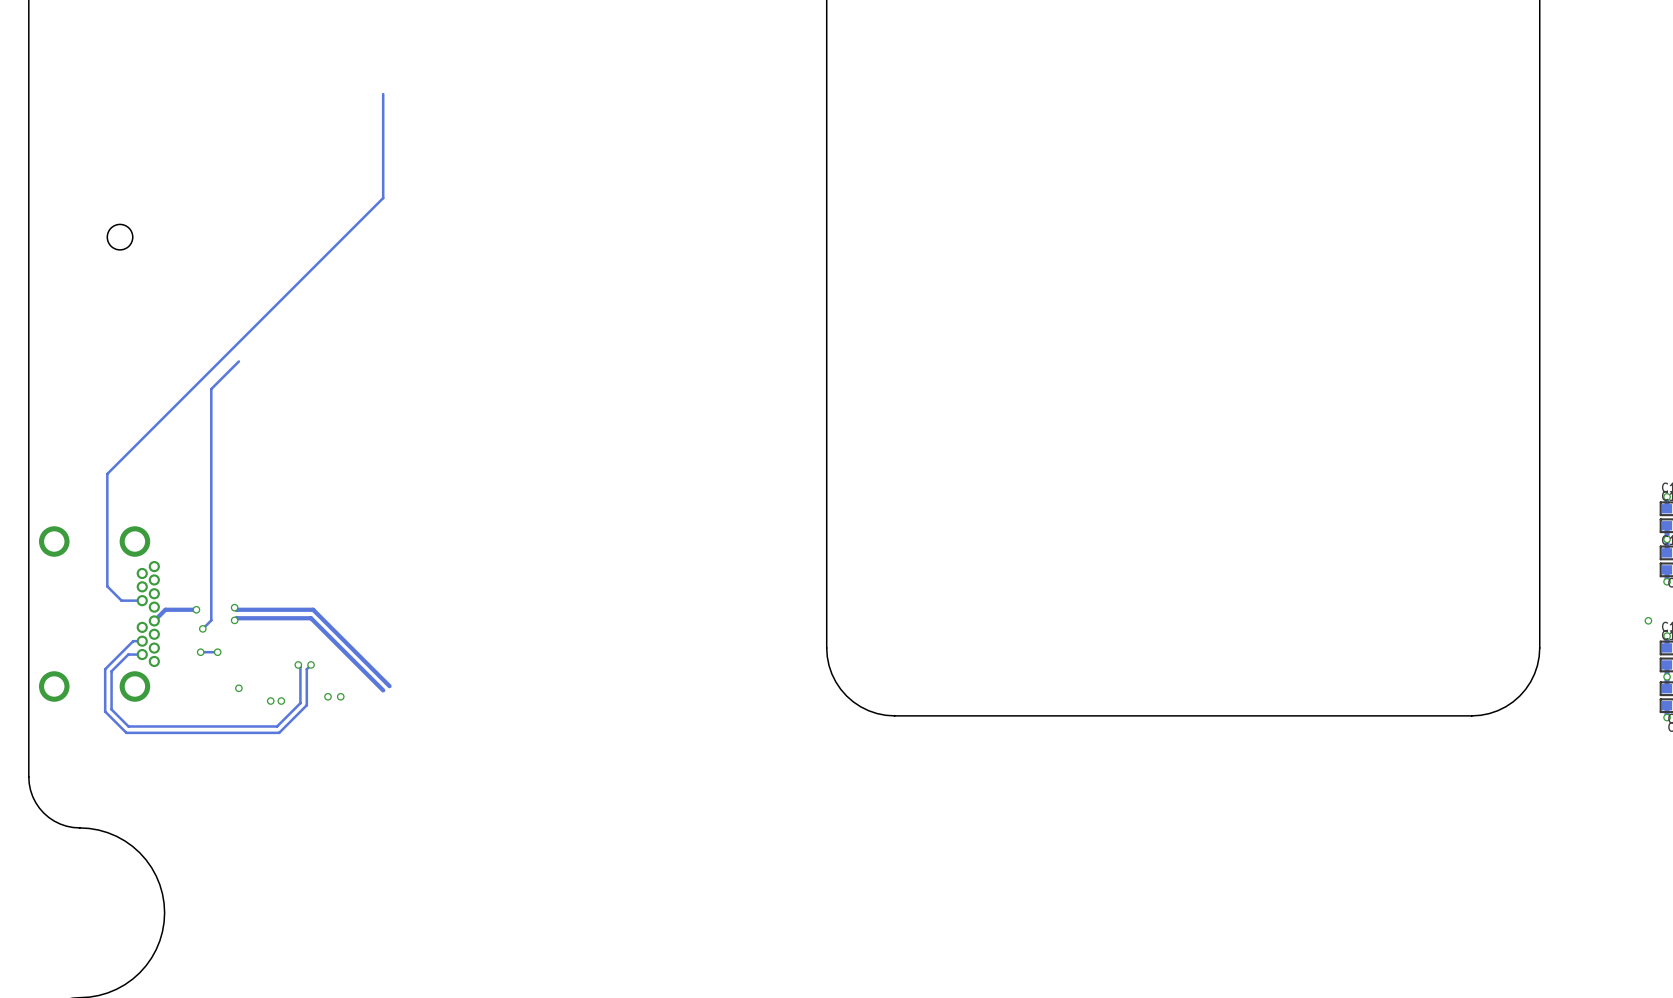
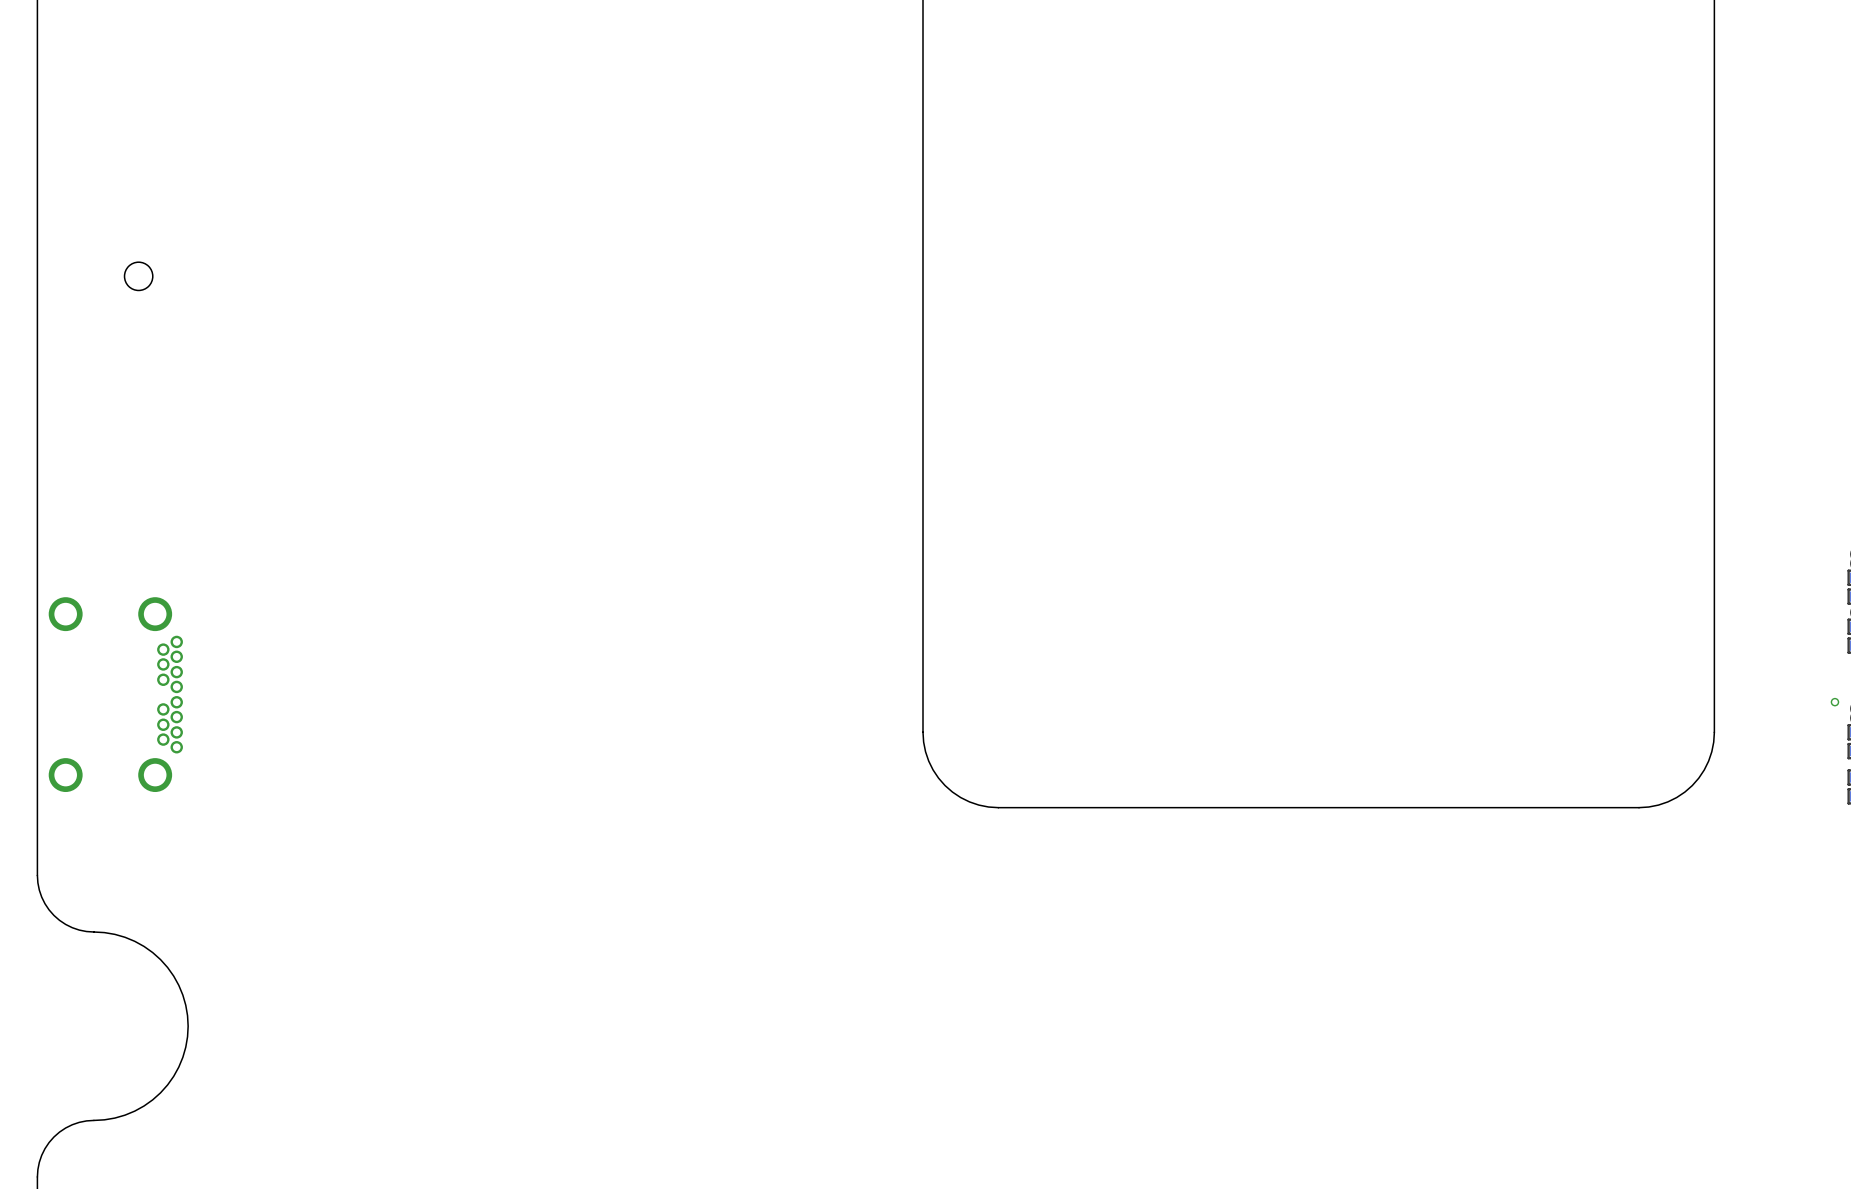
track: (383, 94) (383, 198) (107, 473) (107, 586) (121, 600) (142, 600) -> none
track: (238, 361) (211, 389) (211, 620) (202, 628) -> none
track: (234, 607) (236, 609) (313, 609) (389, 686) -> none
via: (234, 607) -> none
track: (196, 609) (165, 609) (154, 620) -> none
via: (196, 609) -> none
track: (234, 620) (236, 618) (311, 618) (383, 690) -> none
via: (234, 620) -> none
via: (202, 628) -> none
track: (142, 641) (133, 641) (105, 669) (105, 711) (126, 732) (279, 732) (306, 705) (306, 669) (311, 664) -> none
via: (200, 652) -> none
track: (217, 652) (200, 652) -> none
via: (217, 652) -> none
track: (142, 654) (128, 654) (111, 671) (111, 709) (128, 726) (277, 726) (300, 703) (300, 667) (298, 664) -> none
via: (298, 664) -> none
via: (311, 664) -> none
via: (238, 688) -> none
via: (328, 696) -> none
via: (340, 696) -> none
via: (270, 701) -> none
via: (281, 701) -> none

